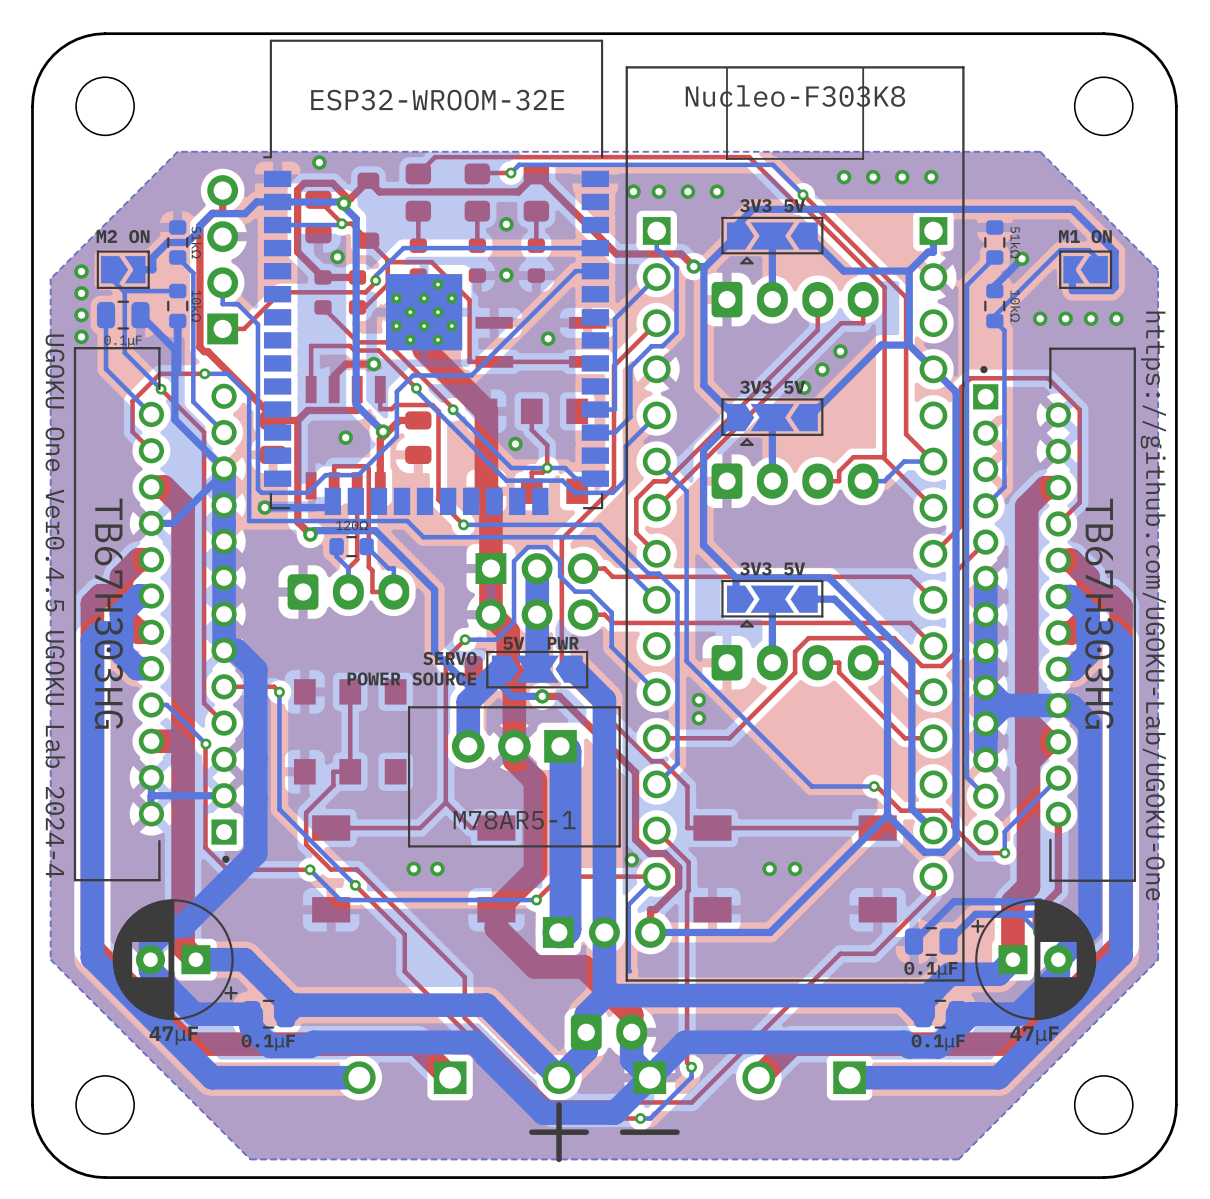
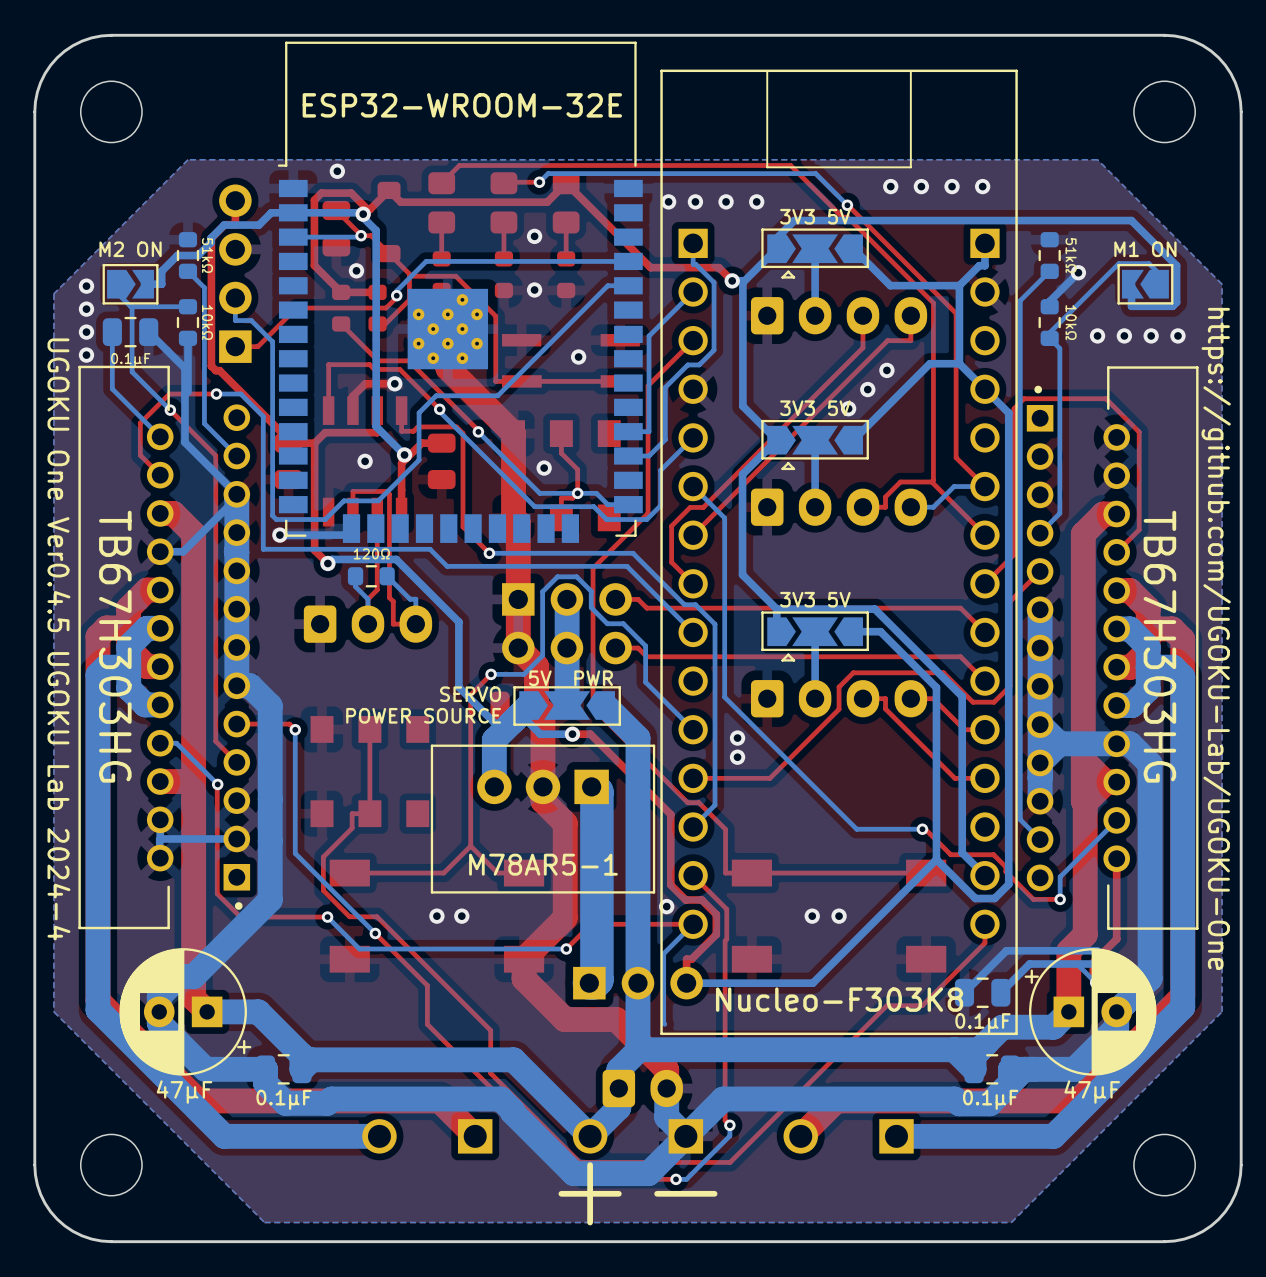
text: Nucleo-F303K8 (795, 96) -> none
text: none -> Nucleo-F303K8 (839, 999)

